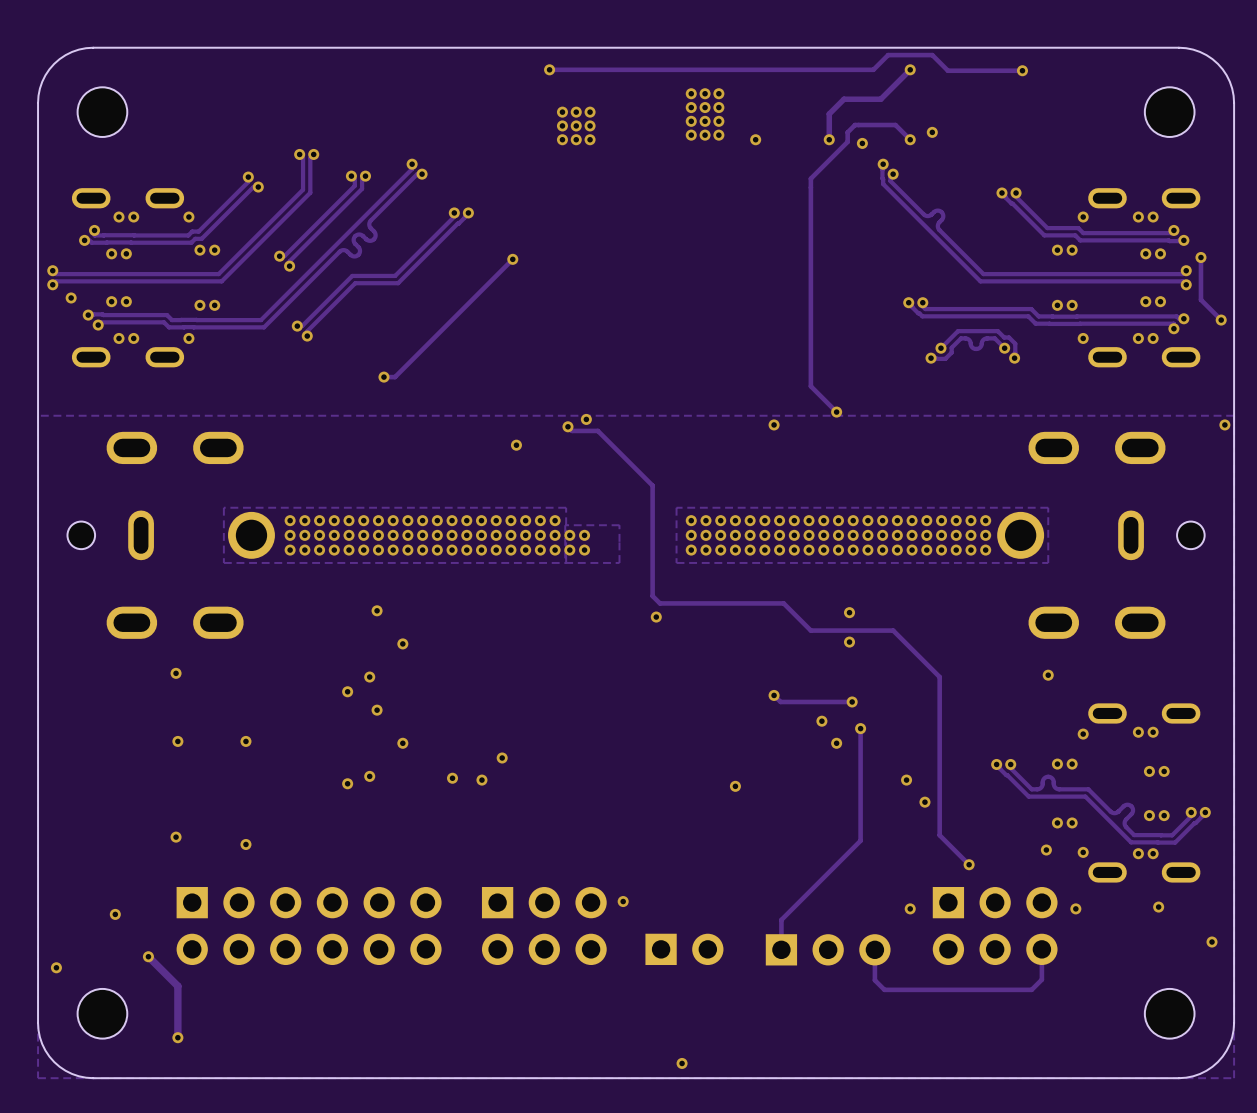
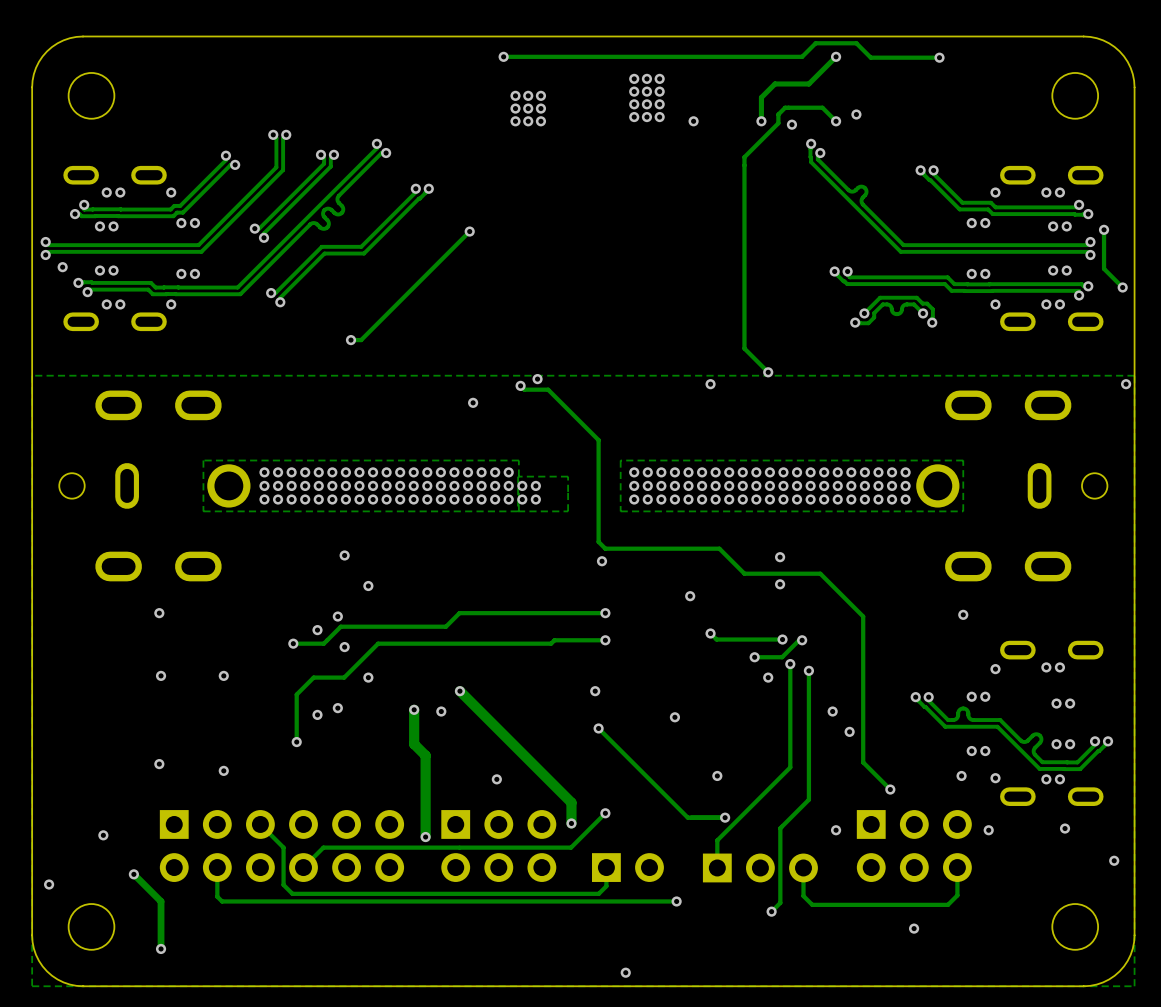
via: none -> (690, 596)
track: none -> (605, 613) (459, 613) (445, 626) (340, 626) (323, 643) (293, 643)
via: none -> (605, 613)
track: none -> (605, 640) (554, 640) (551, 643) (378, 643) (344, 677) (313, 677) (296, 694) (296, 742)
via: none -> (605, 640)
track: none -> (802, 640) (799, 640) (782, 657) (754, 657)
via: none -> (802, 640)
via: none -> (293, 643)
track: none -> (808, 670) (808, 799) (780, 828) (780, 902) (771, 911)
via: none -> (808, 670)
track: none -> (459, 691) (571, 802) (571, 823)
via: none -> (595, 691)
track: none -> (414, 709) (414, 744) (425, 755) (425, 837)
track: none -> (598, 728) (687, 817) (725, 817)
via: none -> (598, 728)
via: none -> (296, 742)
via: none -> (717, 775)
via: none -> (496, 779)
track: none -> (605, 813) (571, 847) (459, 847)
via: none -> (605, 813)
via: none -> (725, 817)
track: none -> (260, 824) (283, 847) (283, 884) (292, 893) (598, 893) (606, 886) (606, 867)
via: none -> (425, 837)
track: none -> (459, 847) (323, 847) (303, 867)
track: none -> (217, 867) (217, 896) (222, 901) (676, 901)
via: none -> (676, 901)
via: none -> (771, 911)
via: none -> (914, 928)

